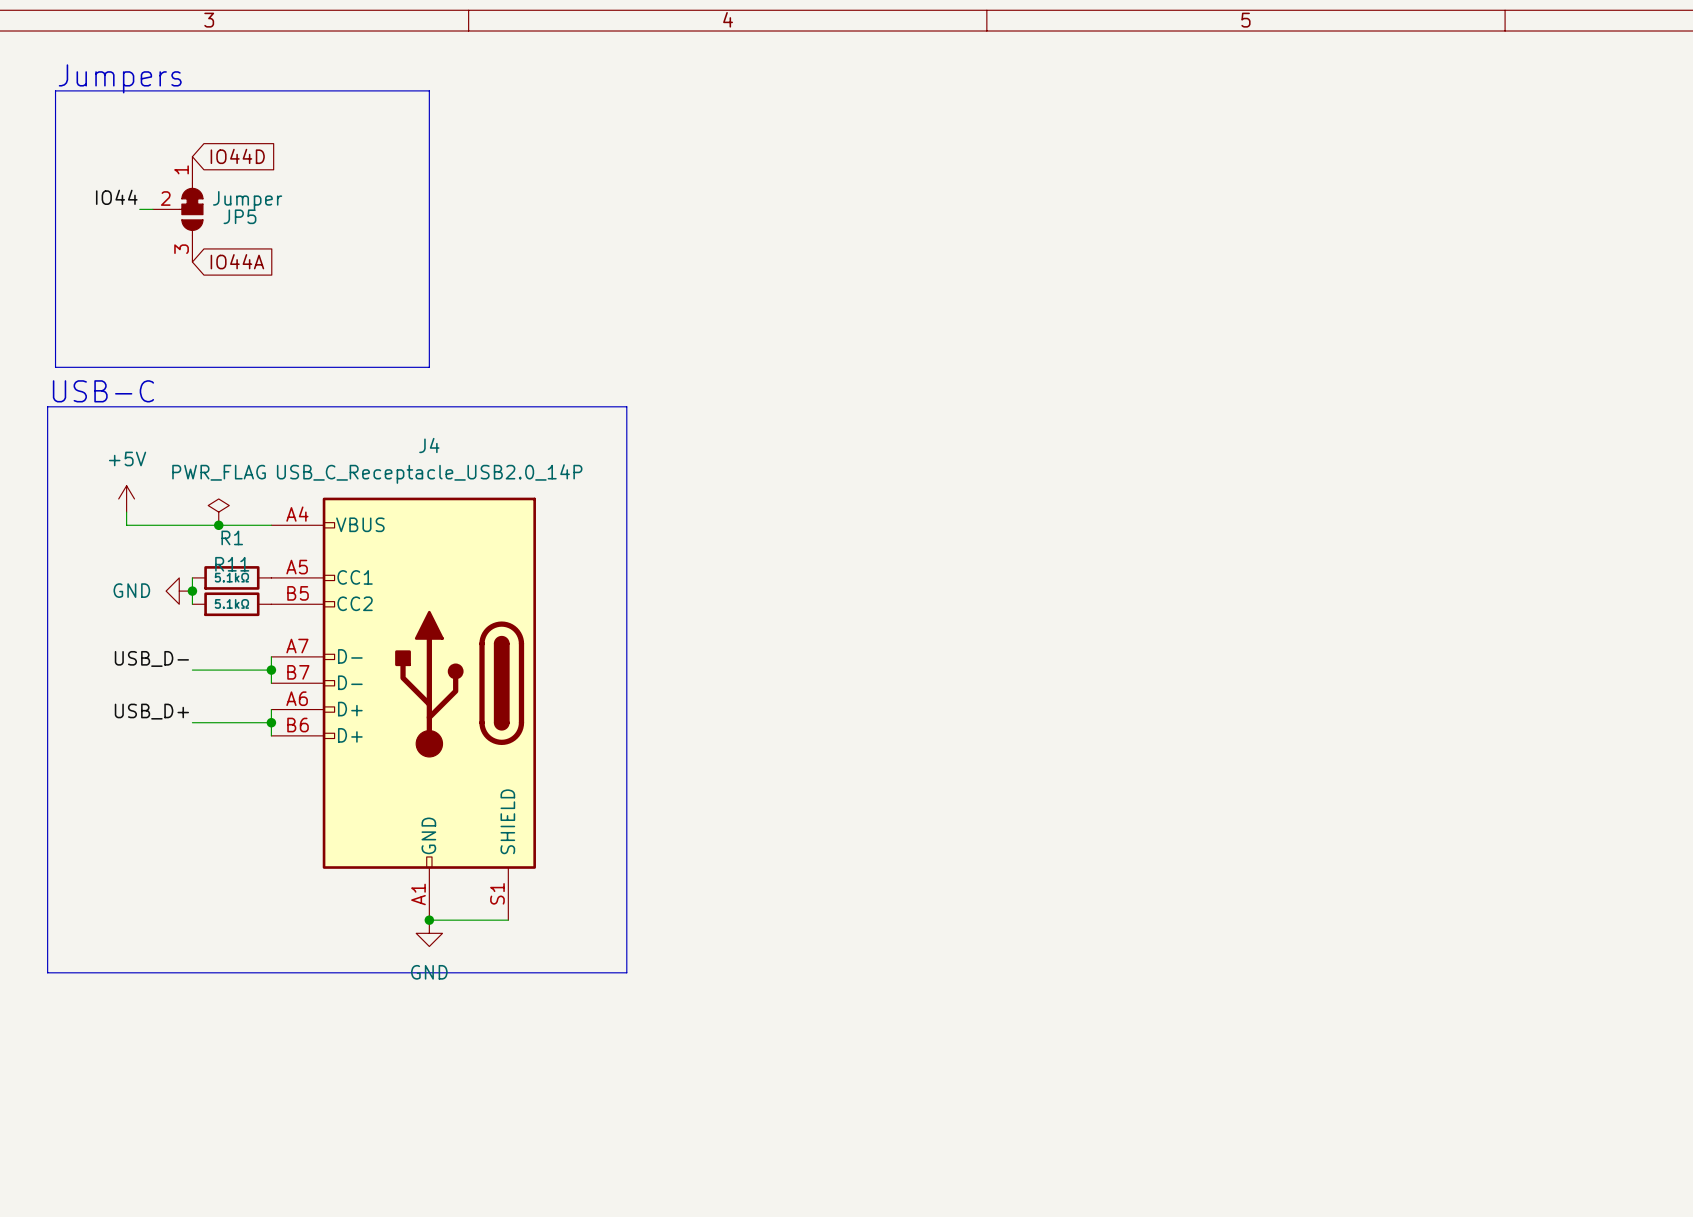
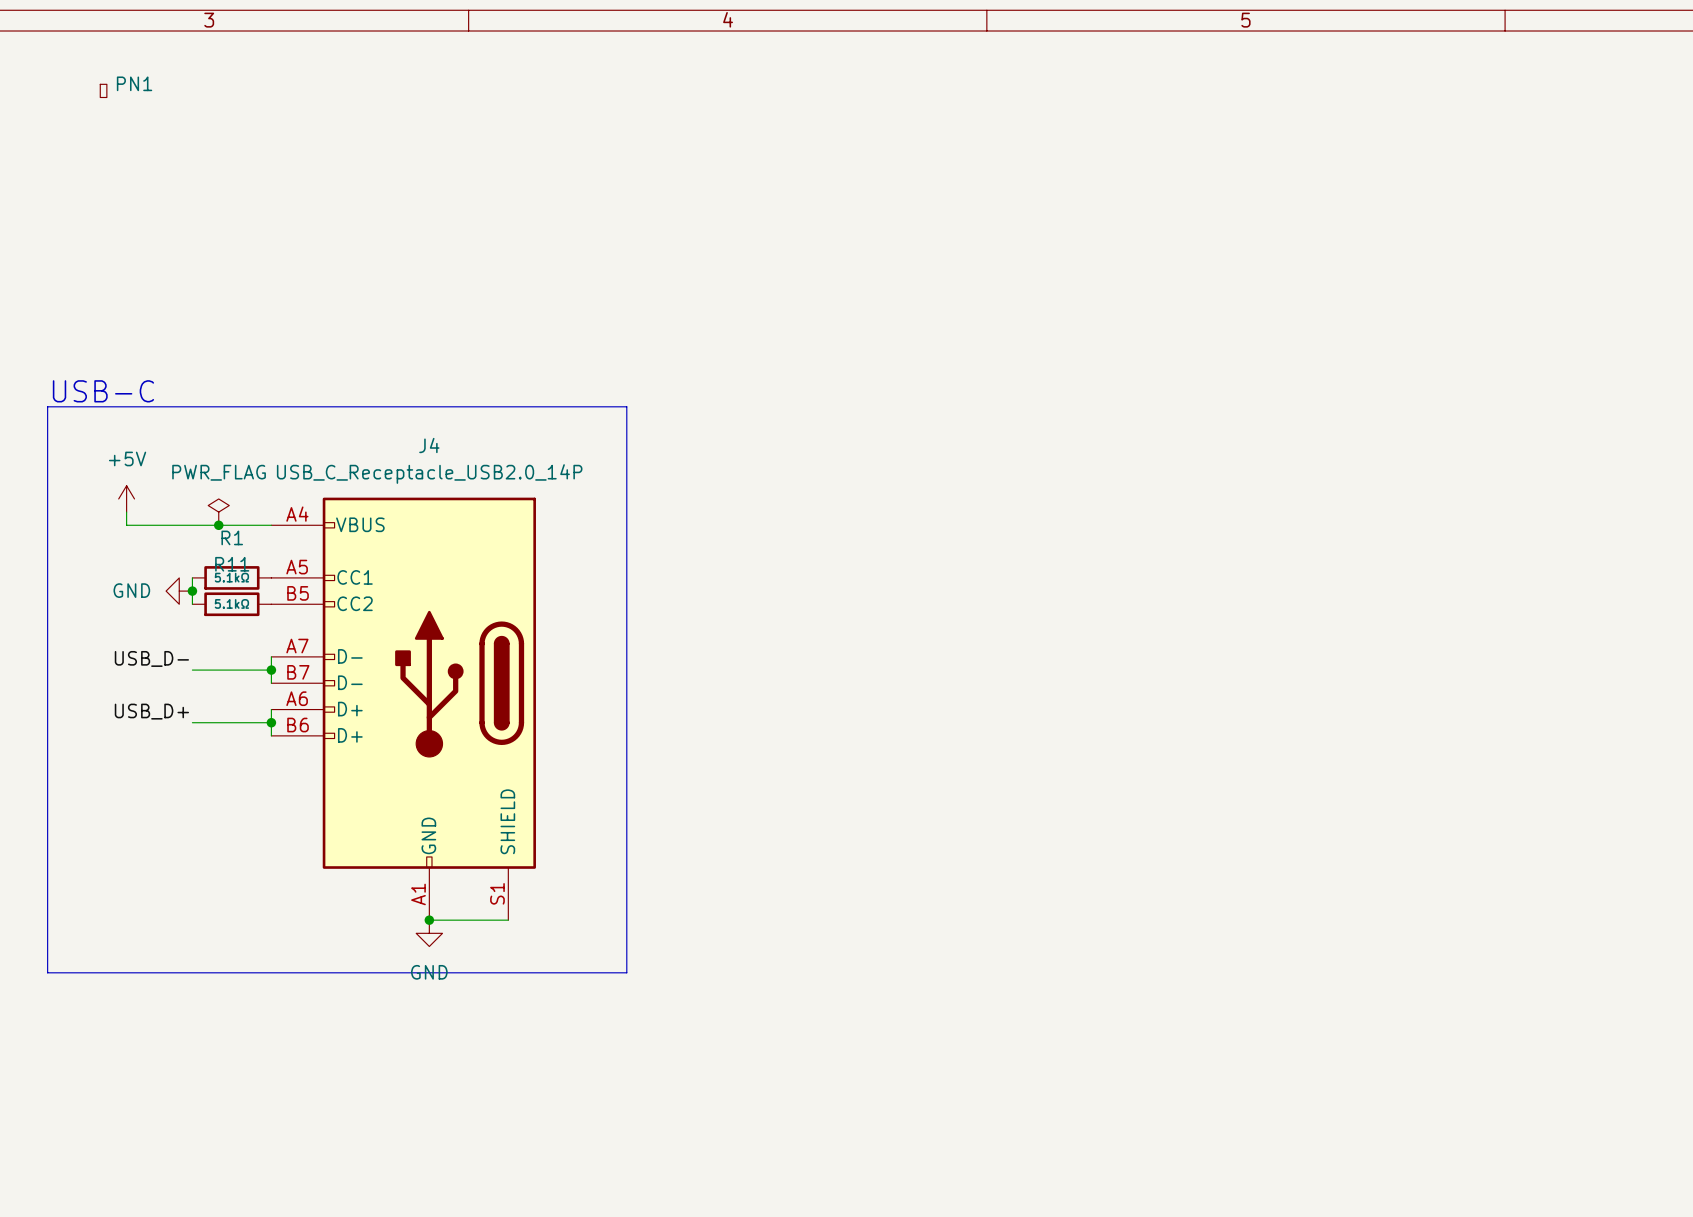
text: Jumpers (120, 78) -> none
line: (55, 90) (429, 90) (429, 367) (55, 367) (55, 90) -> none
PN1: none -> (103, 90)
global label: IO44D (237, 156) -> none
label: IO44 (116, 197) -> none
wire: (139, 209) (152, 209) -> none
JP5: Jumper (177, 209) -> none
global label: IO44A (237, 261) -> none

